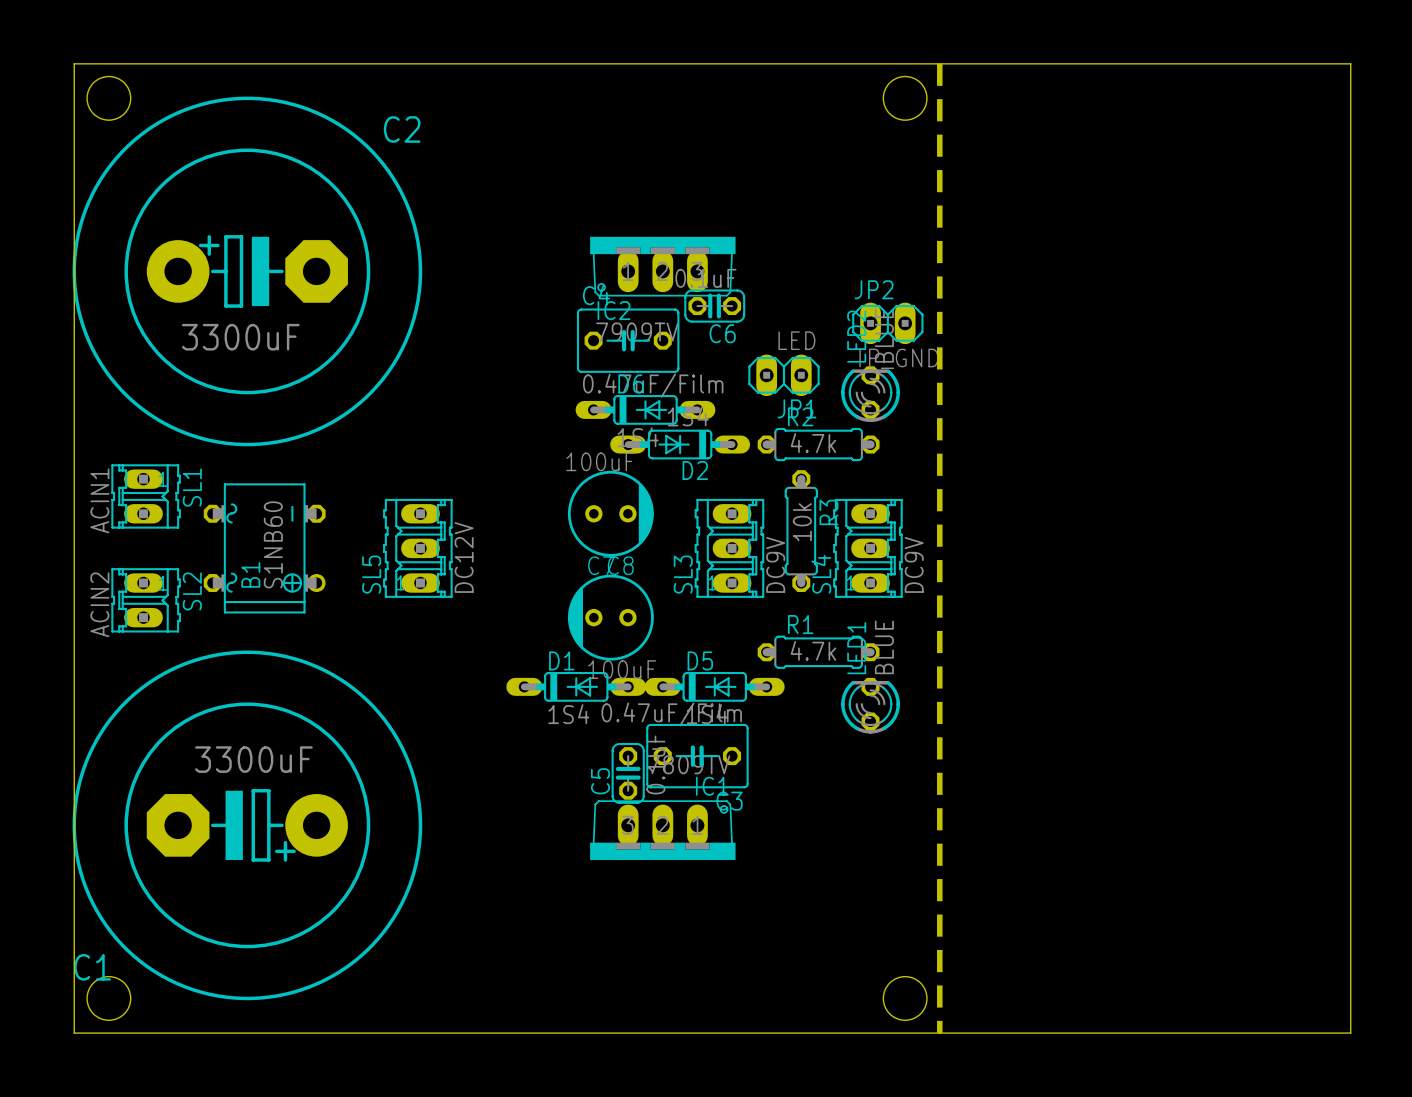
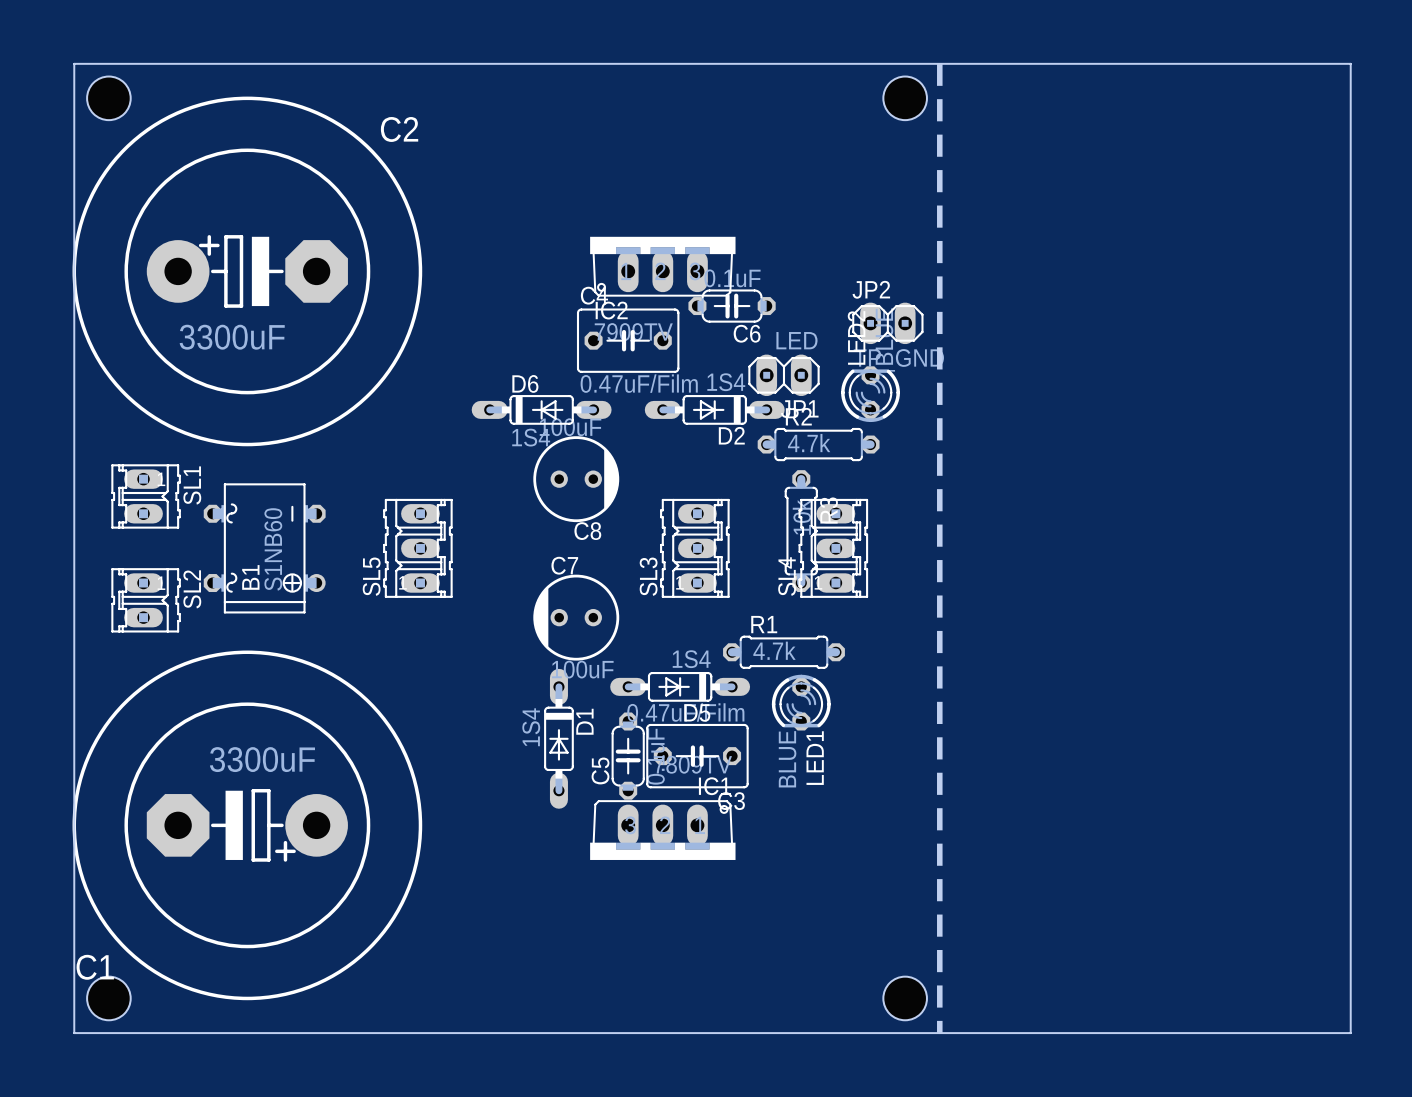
C6 footprint: [684, 289, 746, 323] -> [688, 289, 776, 323]
D6 position: (645, 409) -> (541, 409)
D2 position: (680, 444) -> (714, 409)
SL1 value: ACIN1 (99, 500) -> none
C8 position: (610, 513) -> (576, 479)
SL3 position: (729, 548) -> (694, 548)
SL4 position: (867, 548) -> (833, 548)
SL5 value: DC12V (464, 557) -> none
SL3 value: DC9V (775, 564) -> none
SL4 value: DC9V (914, 564) -> none
SL2 value: ACIN2 (99, 604) -> none
C7 position: (610, 617) -> (576, 617)
R1 position: (818, 652) -> (783, 652)
D1 rotation: 0° (576, 686) -> 90° clockwise (558, 738)
D5 rotation: 0° (714, 686) -> 180° (680, 686)
LED1 rotation: 0° (870, 705) -> 180° (801, 702)
LED1 position: (870, 705) -> (801, 702)
C5 footprint: [611, 742, 645, 804] -> [611, 712, 645, 800]

